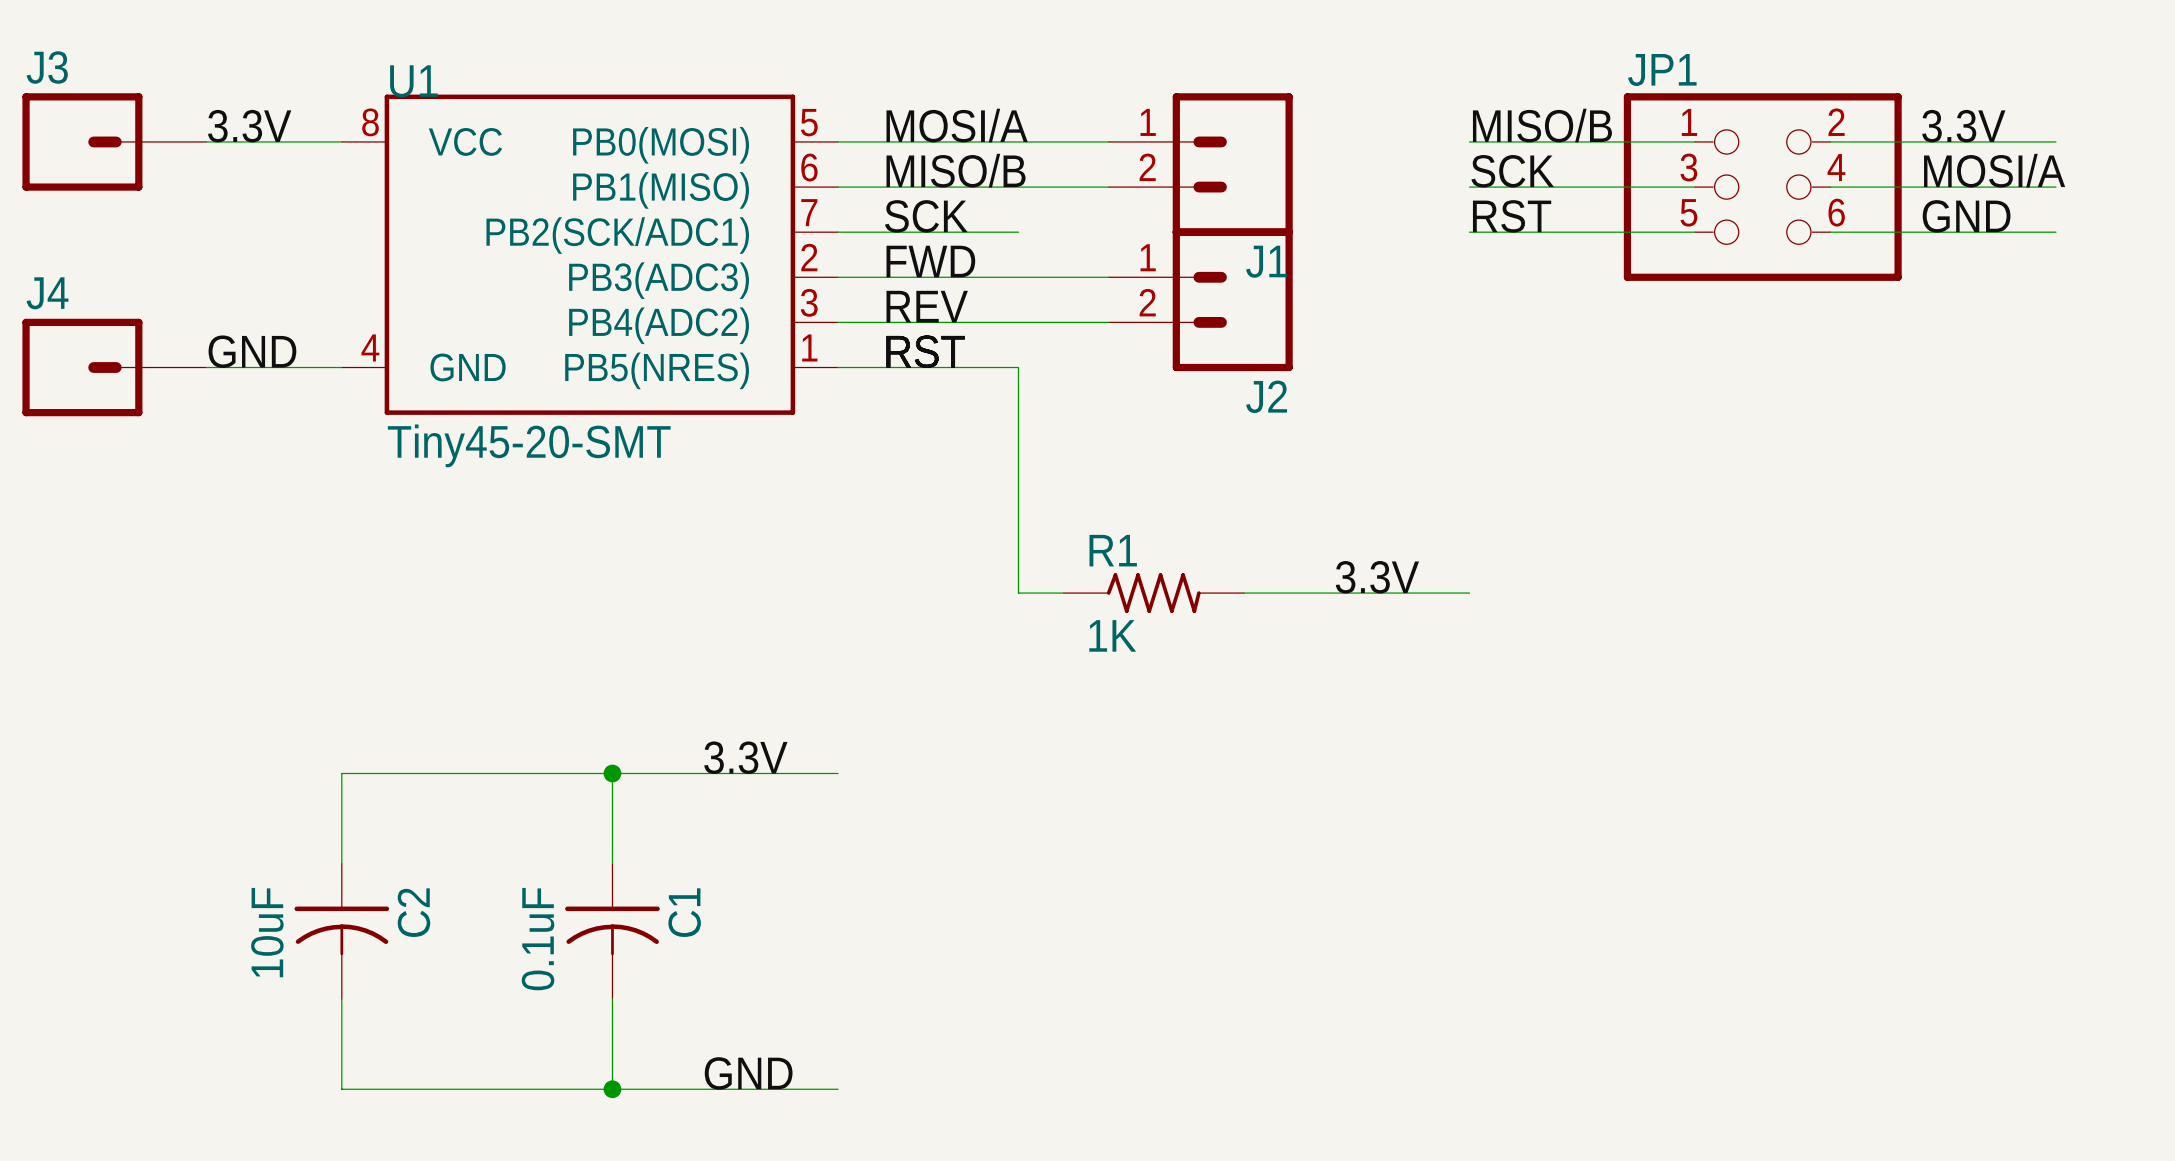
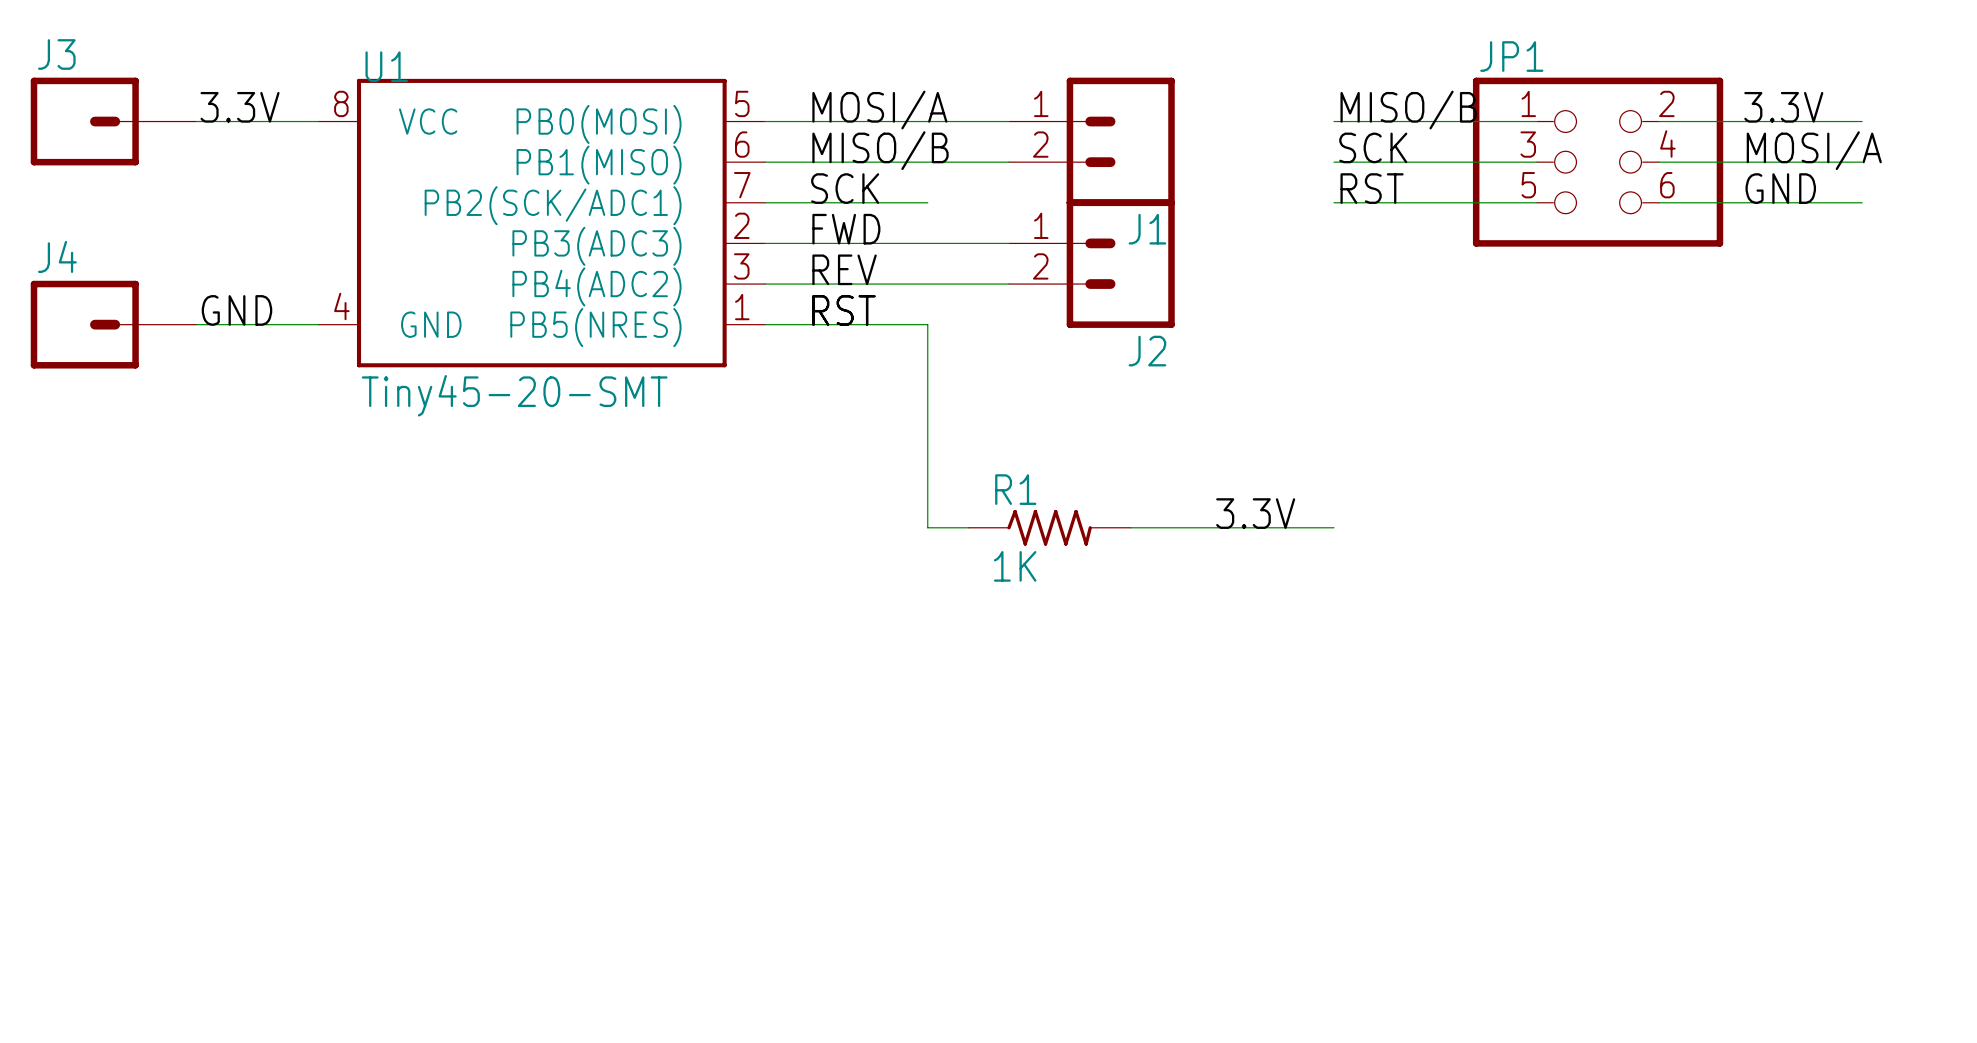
label: 3.3V (745, 757) -> none
wire: (612, 773) (612, 863) -> none
junction: (612, 773) -> none
wire: (838, 773) (341, 773) (341, 863) -> none
C2: 10uF (341, 931) -> none
C1: 0.1uF (612, 931) -> none
wire: (341, 999) (341, 1089) (838, 1089) -> none
wire: (612, 999) (612, 1089) -> none
label: GND (748, 1073) -> none
junction: (612, 1089) -> none

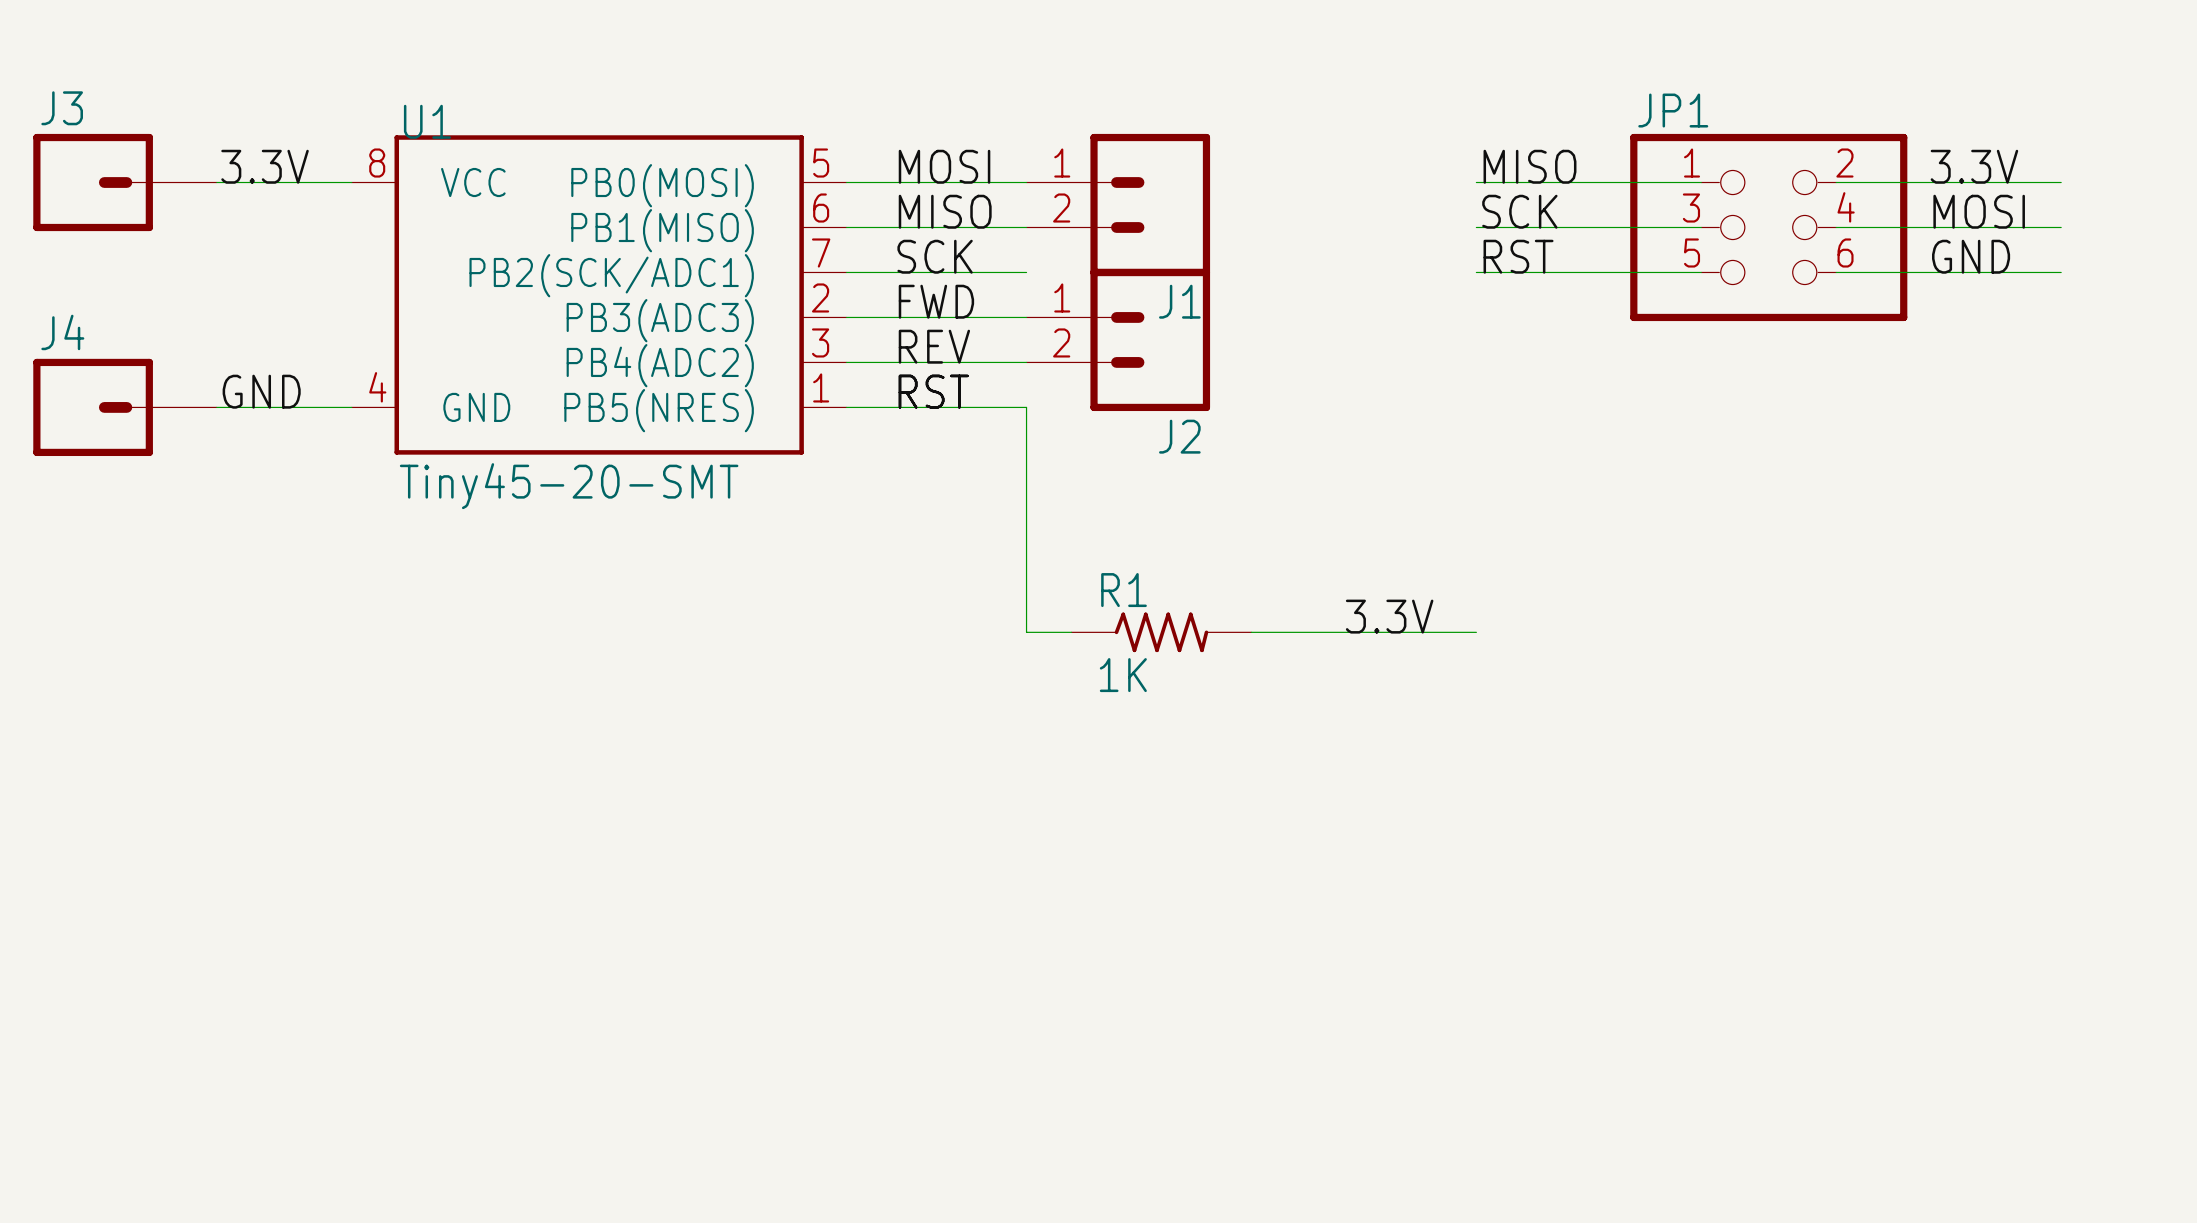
label: MOSI/A (879, 110) -> MOSI (944, 166)
label: MISO/B (1408, 110) -> MISO (1529, 166)
J1 position: (1091, 141) -> (1118, 205)
label: MISO/B (880, 150) -> MISO (945, 211)
label: MOSI/A (1814, 150) -> MOSI (1979, 211)
J2 position: (1091, 263) -> (1118, 339)

